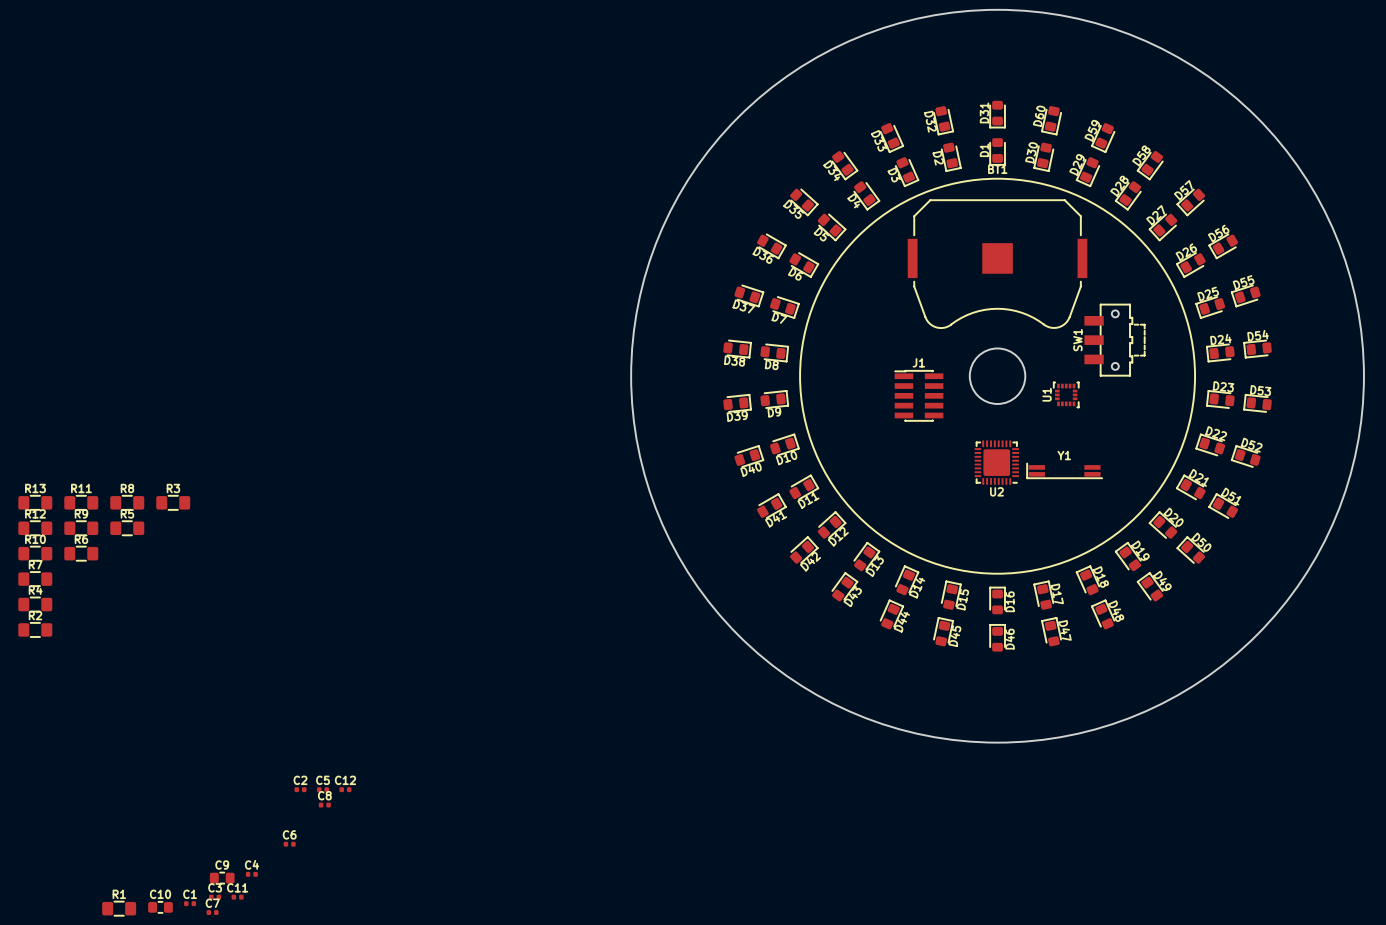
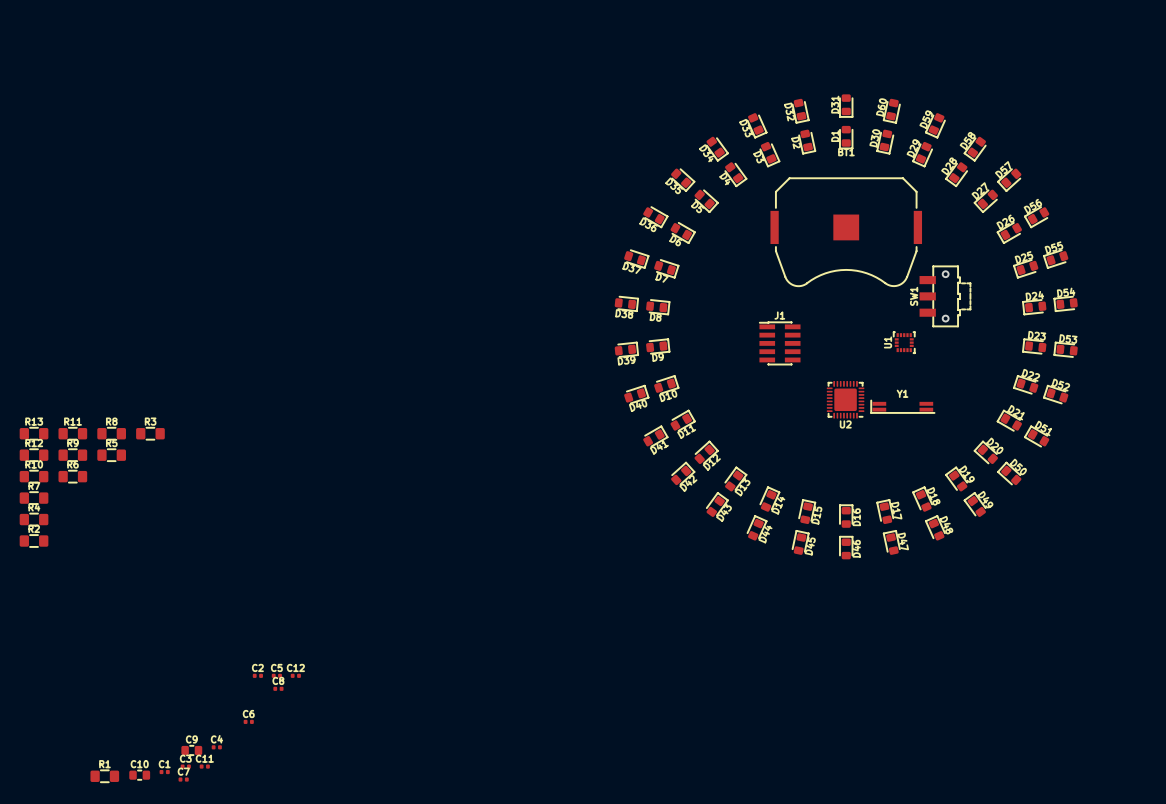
round board edge: [630, 9, 1365, 743] -> none
drawing: [799, 178, 1196, 575] -> none
round board edge: [969, 348, 1026, 405] -> none

